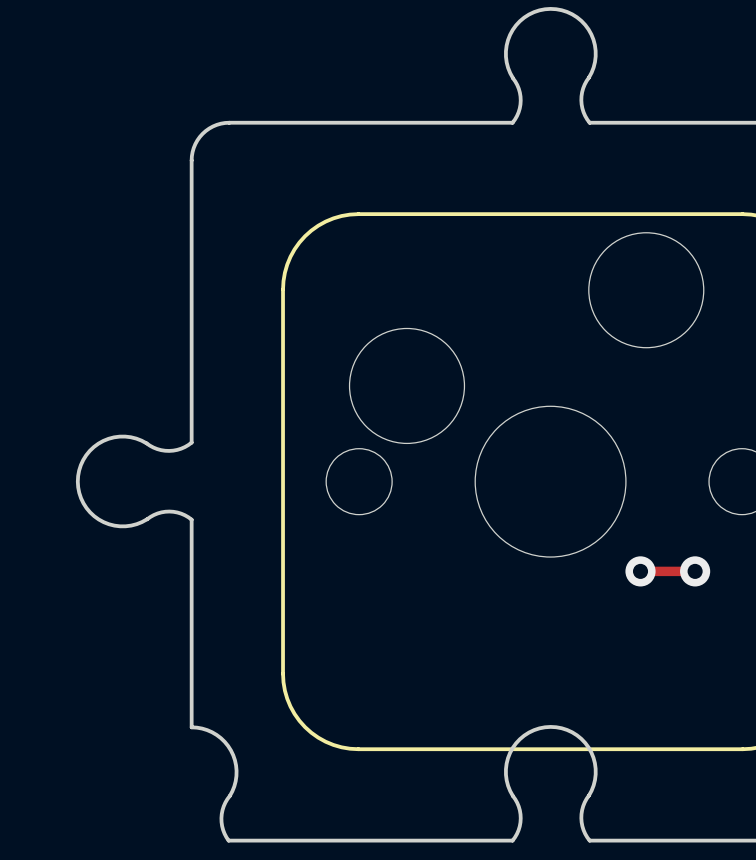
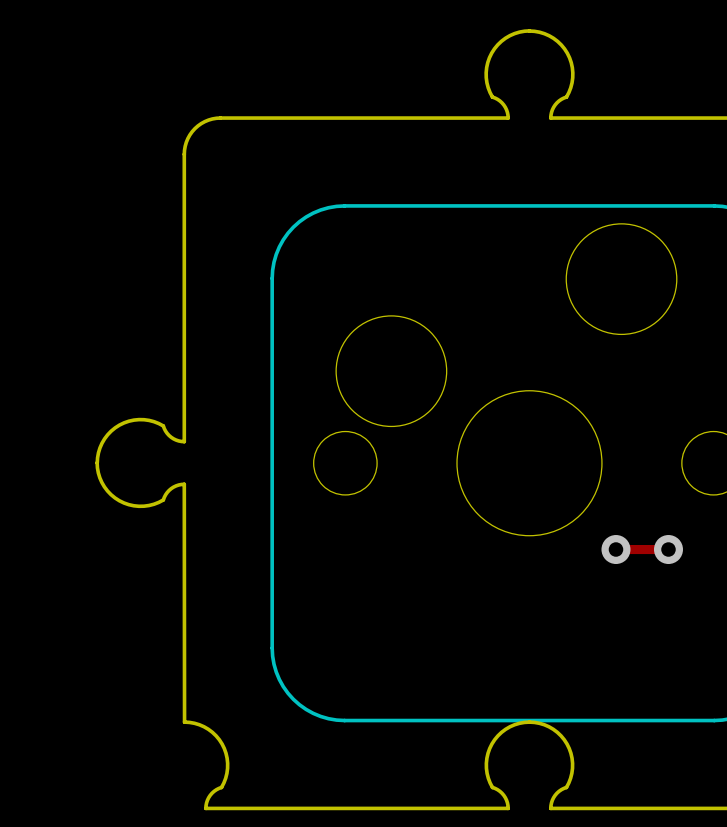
board edge: (512, 78) (506, 62) (505, 51) (508, 40) (516, 25) (524, 17) (539, 10) (556, 9) (572, 14) (585, 24) (594, 45) (593, 67) (584, 84) (581, 96) (583, 112) (589, 122) -> (529, 31) (539, 32) (553, 38) (561, 44) (569, 57) (572, 72) (570, 87) (566, 97) (555, 104) (550, 118) (567, 118)
board edge: (512, 78) (518, 88) (520, 100) (518, 112) (512, 122) -> (529, 30) (514, 33) (505, 38) (494, 48) (489, 57) (486, 72) (488, 87) (492, 97) (503, 104) (508, 118) (492, 118)
board edge: (191, 442) (181, 448) (165, 450) (153, 447) (136, 438) (114, 437) (93, 446) (83, 460) (78, 476) (79, 492) (86, 508) (94, 516) (109, 524) (120, 526) (131, 525) (146, 519) -> (184, 425) (184, 441) (171, 437) (163, 425) (154, 421) (138, 419) (124, 422) (115, 427) (104, 438) (98, 452) (97, 462)
board edge: (147, 519) (157, 513) (169, 511) (181, 513) (191, 519) (191, 727) (207, 730) (220, 738) (228, 745) (234, 760) (235, 781) (223, 806) (221, 818) (223, 829) (228, 840) -> (97, 462) (98, 472) (104, 486) (115, 497) (128, 504) (138, 506) (154, 504) (163, 499) (171, 488) (184, 484) (184, 722) (199, 724) (208, 729) (219, 739) (224, 748) (227, 763) (225, 778) (221, 787) (210, 795) (205, 808) (219, 808)
board edge: (588, 795) (593, 785) (595, 768) (593, 757) (585, 743) (572, 732) (556, 727) (539, 728) (528, 732) (516, 743) (506, 763) (508, 785) (517, 802) (520, 814) (519, 826) (512, 840) -> (567, 808) (550, 808) (555, 795) (566, 787) (570, 778) (572, 763) (569, 748) (561, 735) (553, 729) (539, 723) (529, 722) (519, 723) (505, 729) (494, 739) (489, 748) (486, 763) (488, 778) (492, 787) (503, 795) (508, 808) (492, 808)
board edge: (588, 795) (583, 806) (581, 818) (583, 830) (589, 840) -> none

